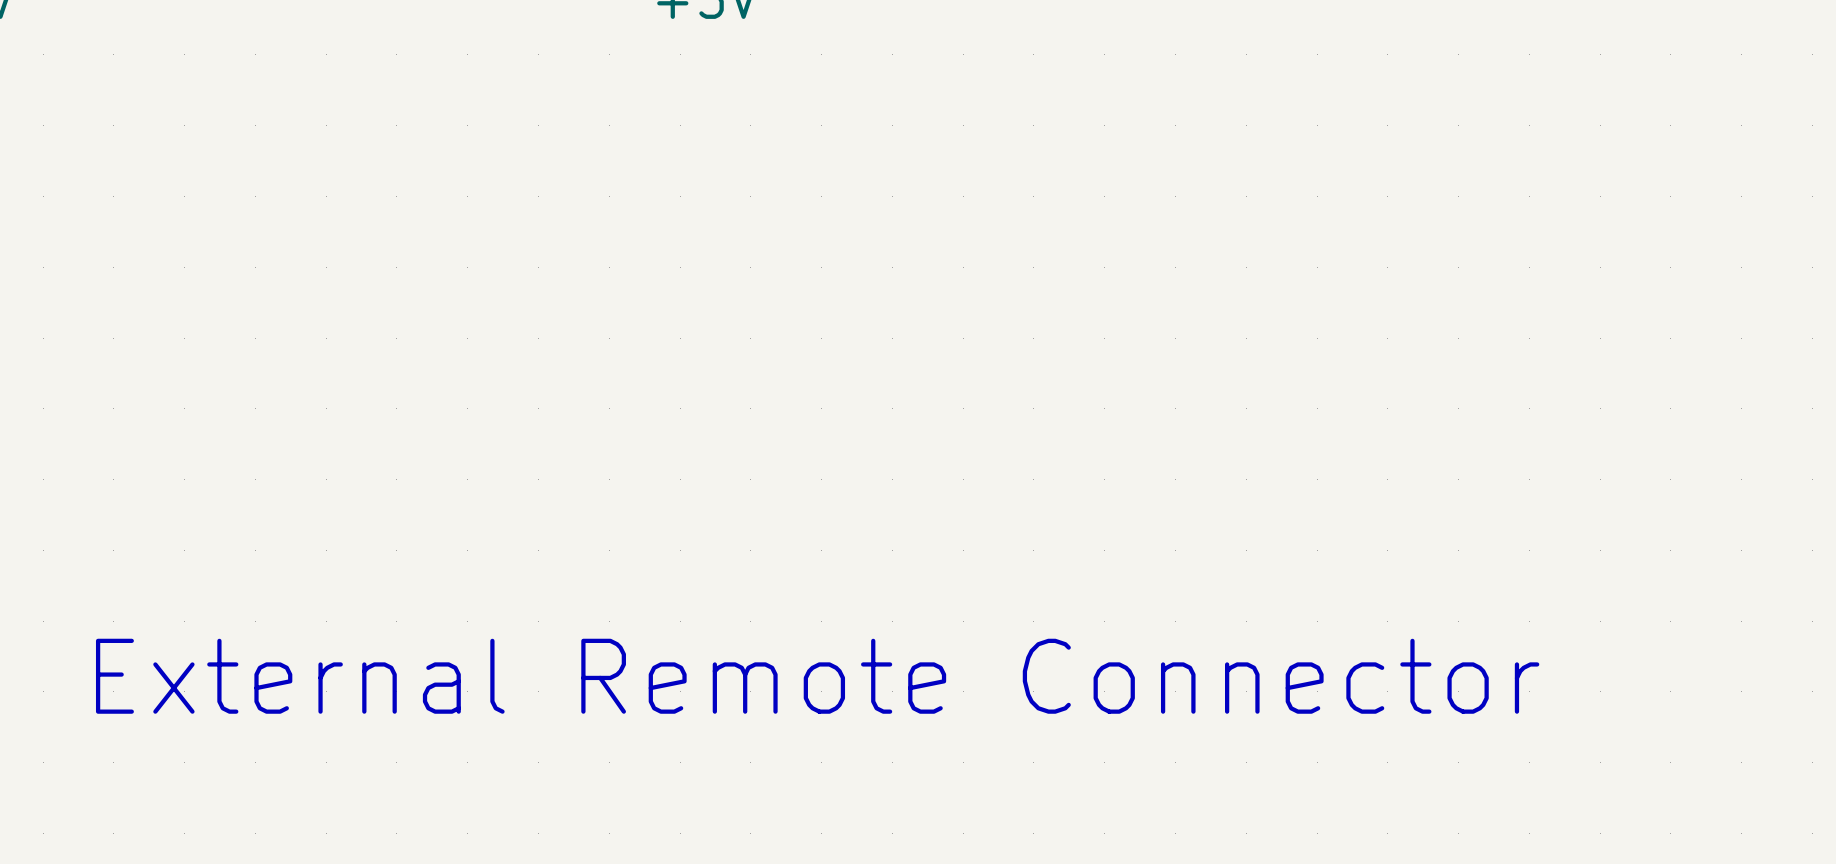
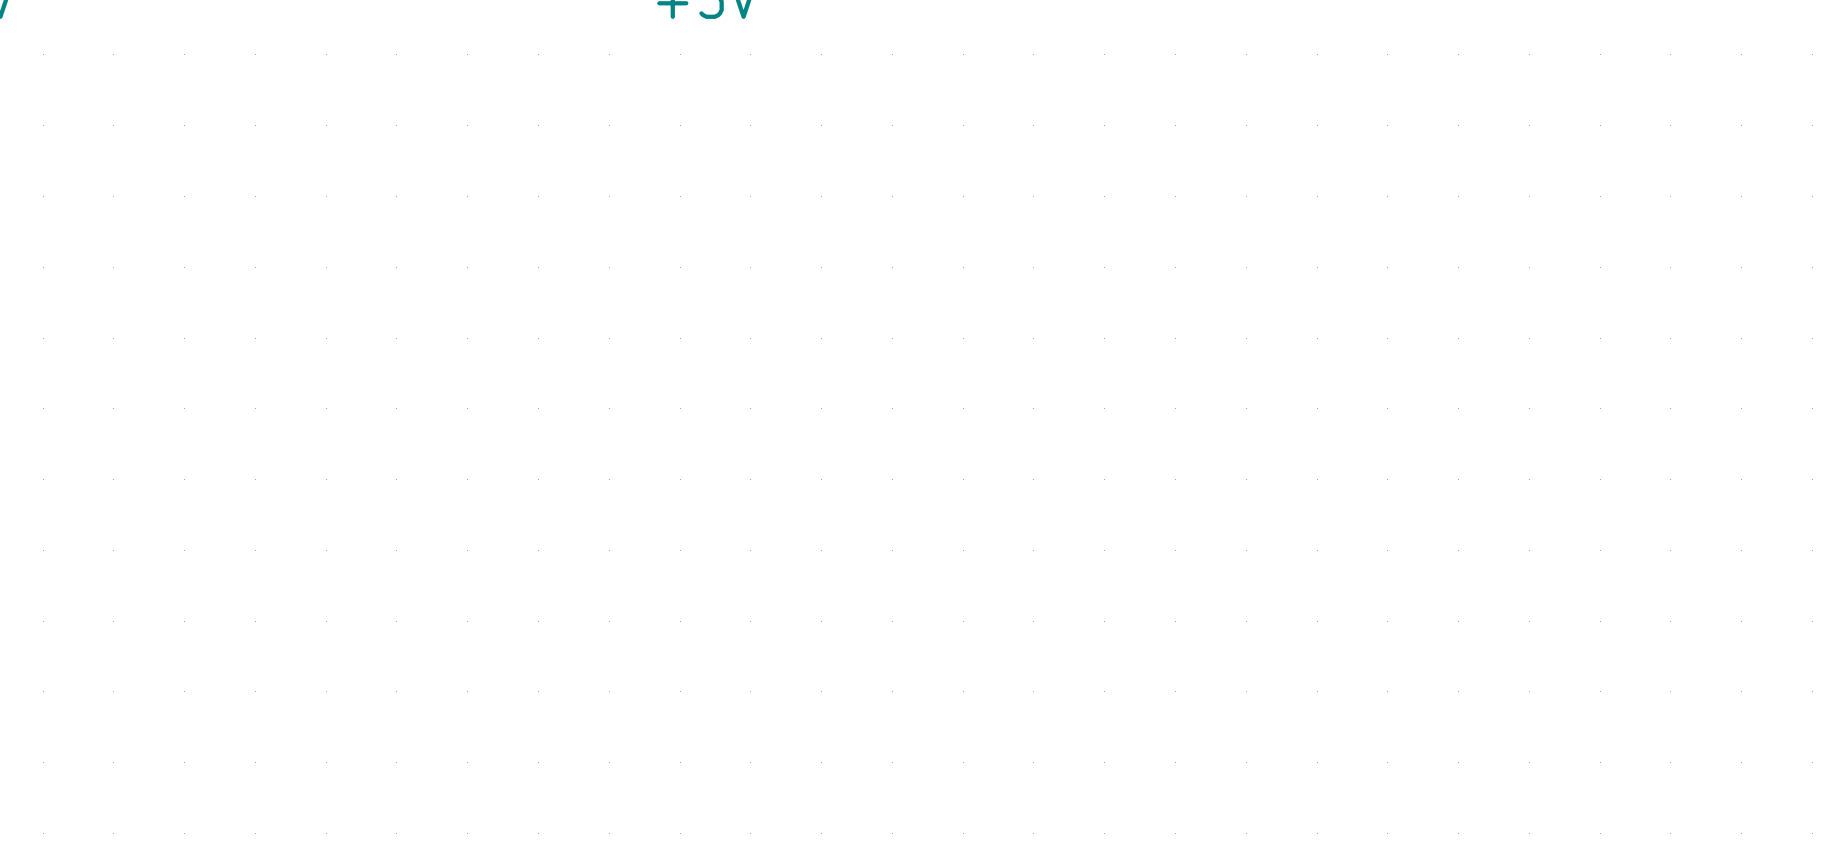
text: External Remote Connector (817, 676) -> none

